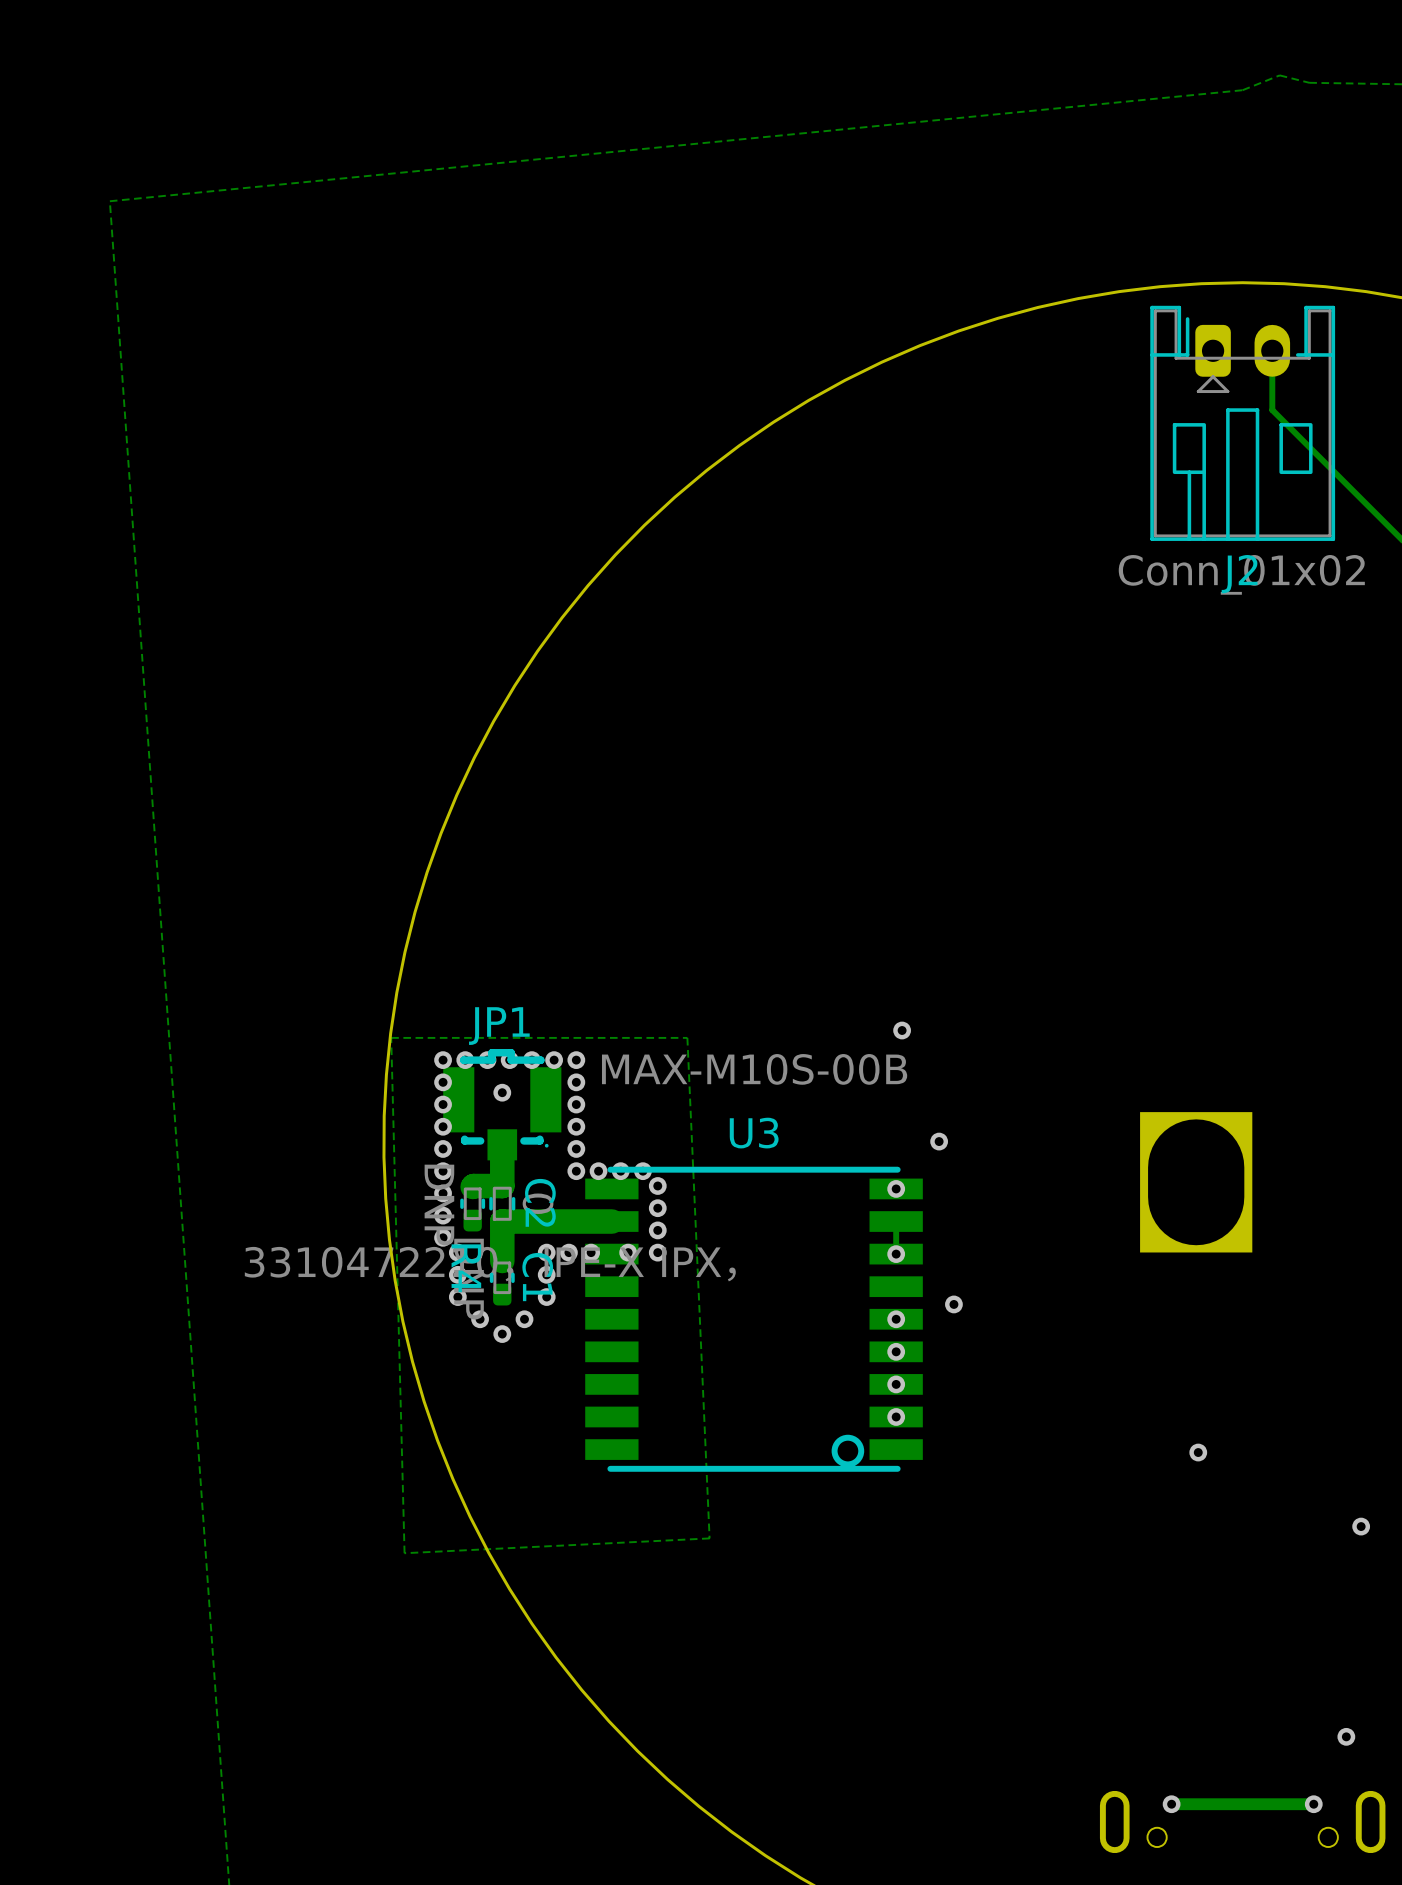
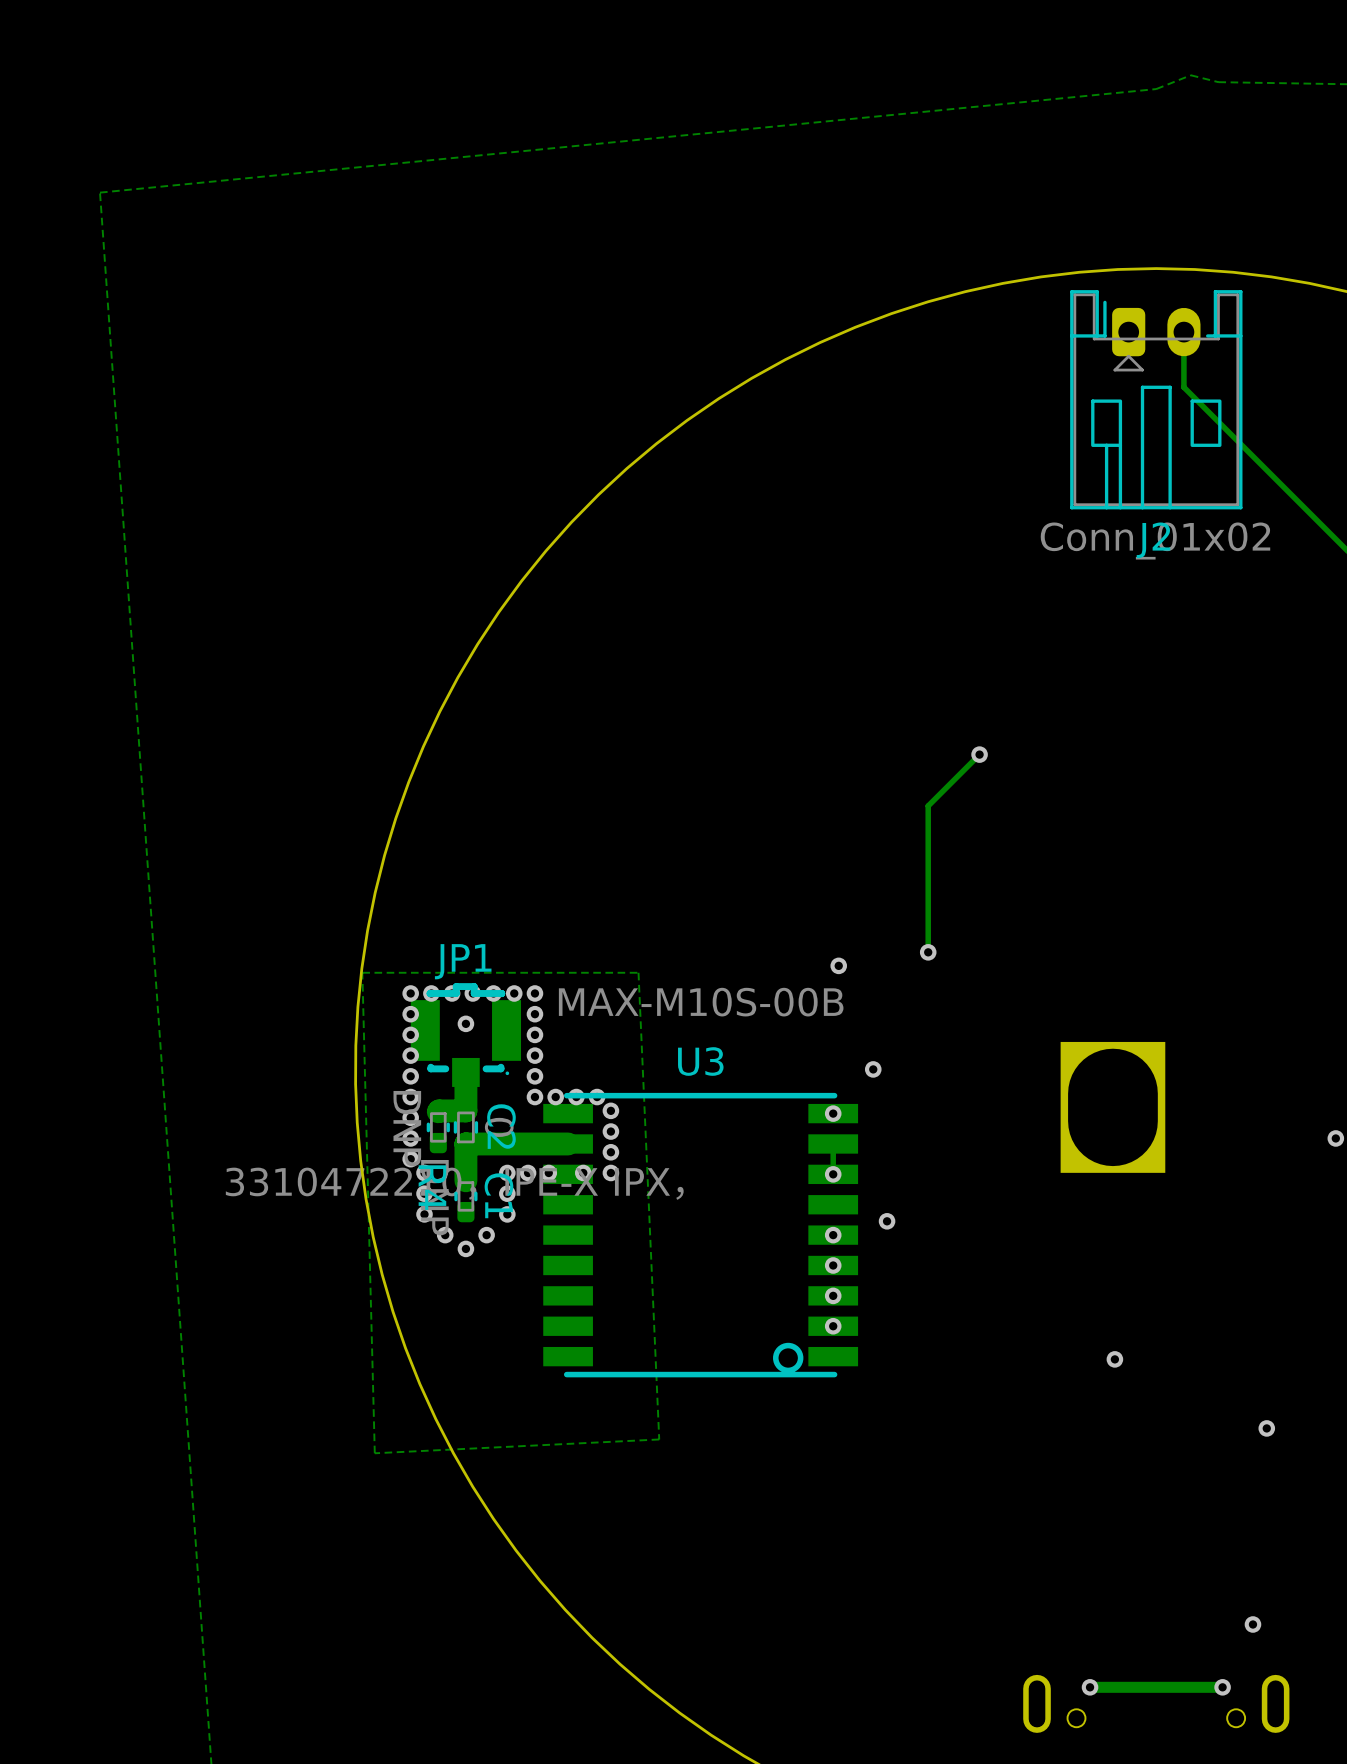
track: none -> (979, 754) (928, 805) (928, 952)
via: none -> (979, 754)
via: none -> (928, 952)

